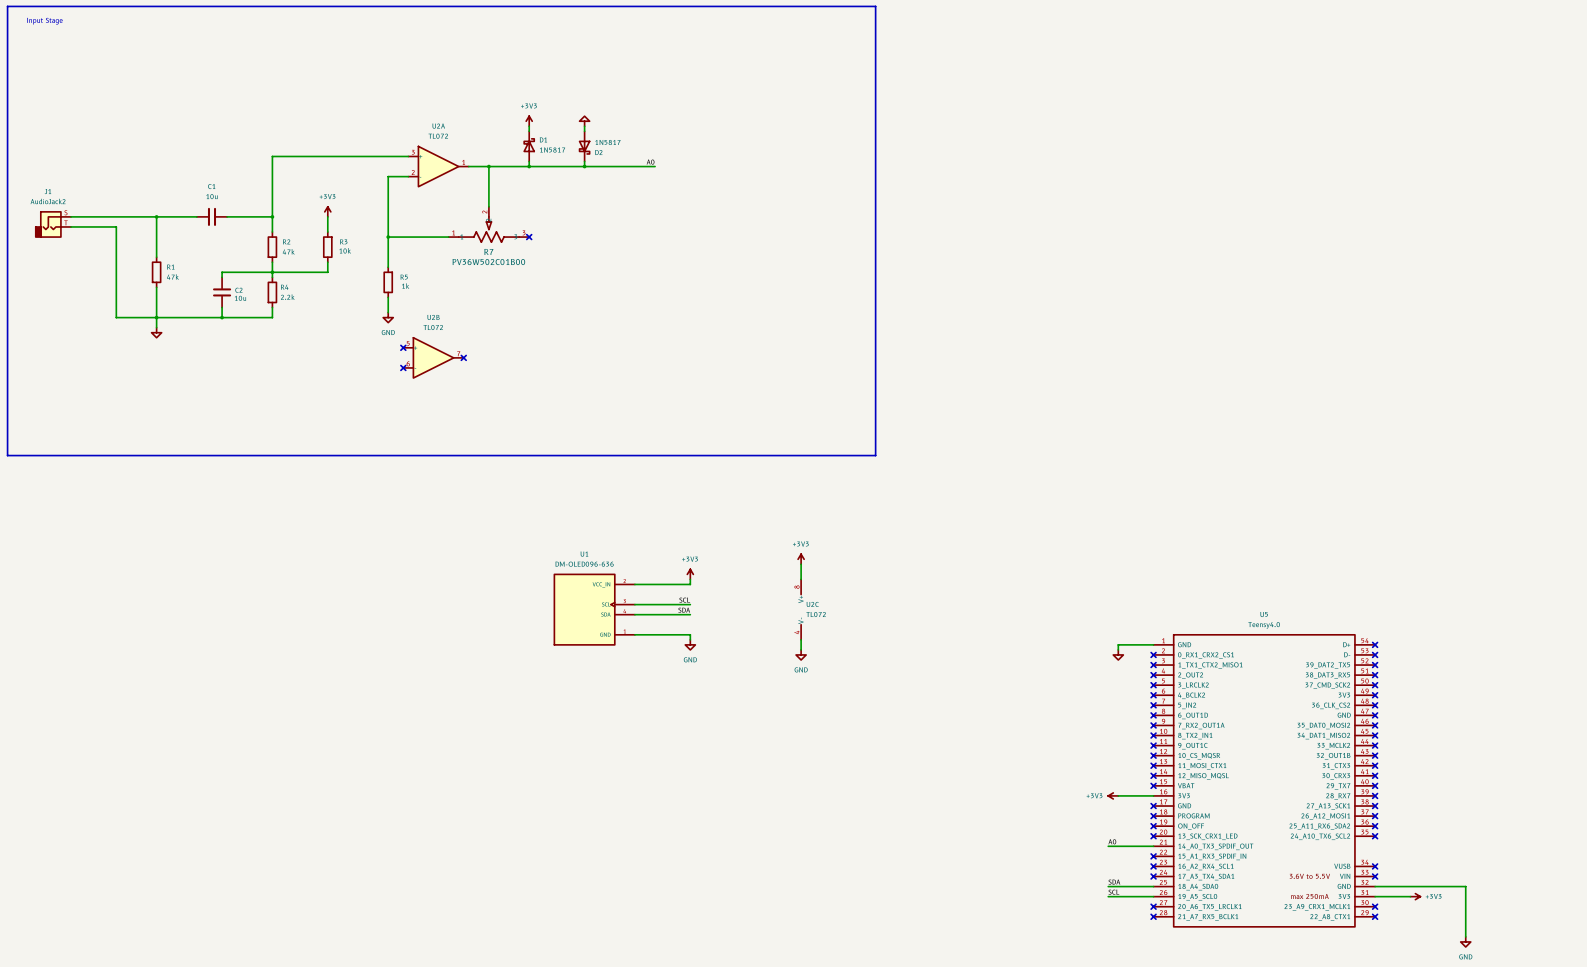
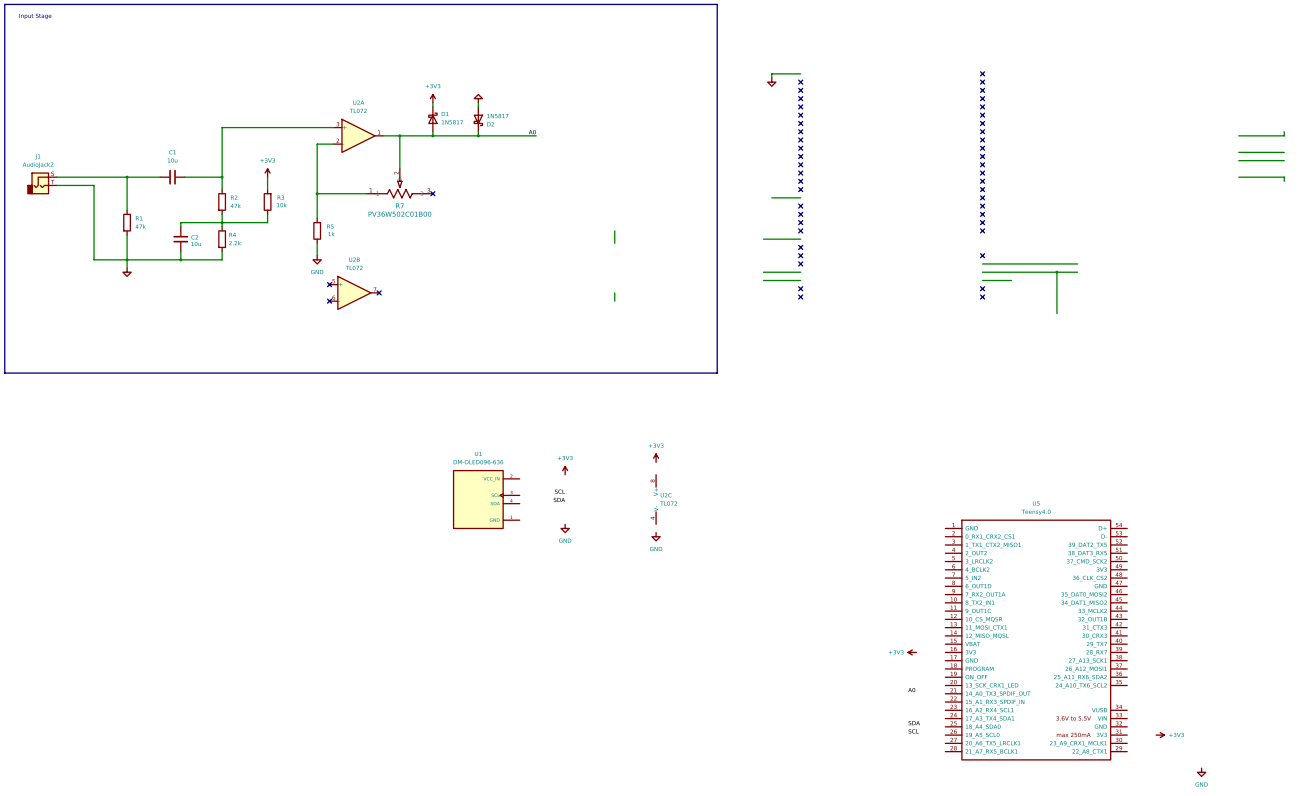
wire: none -> (800, 73) (771, 73) (771, 77)
no-connect mark: none -> (982, 73)
power symbol: none -> (771, 82)
no-connect mark: none -> (800, 82)
no-connect mark: none -> (982, 82)
no-connect mark: none -> (800, 90)
no-connect mark: none -> (982, 90)
no-connect mark: none -> (800, 98)
no-connect mark: none -> (982, 98)
no-connect mark: none -> (800, 106)
no-connect mark: none -> (982, 106)
no-connect mark: none -> (800, 115)
no-connect mark: none -> (982, 115)
no-connect mark: none -> (800, 123)
no-connect mark: none -> (982, 123)
no-connect mark: none -> (800, 131)
no-connect mark: none -> (982, 131)
wire: none -> (1284, 131) (1284, 135) (1238, 135)
no-connect mark: none -> (800, 139)
no-connect mark: none -> (982, 139)
no-connect mark: none -> (800, 148)
no-connect mark: none -> (982, 148)
wire: none -> (1238, 152) (1284, 152)
no-connect mark: none -> (800, 156)
no-connect mark: none -> (982, 156)
wire: none -> (1238, 160) (1284, 160)
no-connect mark: none -> (800, 164)
no-connect mark: none -> (982, 164)
no-connect mark: none -> (800, 173)
no-connect mark: none -> (982, 173)
wire: none -> (1238, 177) (1284, 177) (1284, 181)
no-connect mark: none -> (800, 181)
no-connect mark: none -> (982, 181)
no-connect mark: none -> (800, 189)
no-connect mark: none -> (982, 189)
wire: none -> (771, 197) (800, 197)
no-connect mark: none -> (982, 197)
no-connect mark: none -> (800, 206)
no-connect mark: none -> (982, 206)
no-connect mark: none -> (800, 214)
no-connect mark: none -> (982, 214)
no-connect mark: none -> (800, 222)
no-connect mark: none -> (982, 222)
wire: none -> (614, 230) (614, 243)
no-connect mark: none -> (800, 230)
no-connect mark: none -> (982, 230)
wire: none -> (763, 239) (800, 239)
no-connect mark: none -> (800, 247)
no-connect mark: none -> (800, 255)
no-connect mark: none -> (982, 255)
no-connect mark: none -> (800, 263)
wire: none -> (982, 263) (1077, 263)
wire: none -> (763, 272) (800, 272)
wire: none -> (982, 272) (1077, 272)
wire: none -> (1056, 272) (1056, 313)
junction: none -> (1056, 272)
wire: none -> (763, 280) (800, 280)
wire: none -> (982, 280) (1011, 280)
no-connect mark: none -> (800, 288)
no-connect mark: none -> (982, 288)
wire: none -> (614, 292) (614, 301)
no-connect mark: none -> (800, 297)
no-connect mark: none -> (982, 297)
wire: (801, 564) (801, 579) -> none
wire: (690, 579) (690, 584) (634, 584) -> none
wire: (634, 604) (690, 604) -> none
wire: (634, 614) (690, 614) -> none
wire: (634, 634) (690, 634) (690, 639) -> none
wire: (801, 639) (801, 649) -> none
wire: (1153, 644) (1118, 644) (1118, 649) -> none
no-connect mark: (1375, 644) -> none
power symbol: (1118, 654) -> none
no-connect mark: (1153, 654) -> none
no-connect mark: (1375, 654) -> none
no-connect mark: (1153, 665) -> none
no-connect mark: (1375, 665) -> none
no-connect mark: (1153, 675) -> none
no-connect mark: (1375, 675) -> none
no-connect mark: (1153, 685) -> none
no-connect mark: (1375, 685) -> none
no-connect mark: (1153, 695) -> none
no-connect mark: (1375, 695) -> none
no-connect mark: (1153, 705) -> none
no-connect mark: (1375, 705) -> none
no-connect mark: (1153, 715) -> none
no-connect mark: (1375, 715) -> none
no-connect mark: (1153, 725) -> none
no-connect mark: (1375, 725) -> none
no-connect mark: (1153, 735) -> none
no-connect mark: (1375, 735) -> none
no-connect mark: (1153, 745) -> none
no-connect mark: (1375, 745) -> none
no-connect mark: (1153, 755) -> none
no-connect mark: (1375, 755) -> none
no-connect mark: (1153, 765) -> none
no-connect mark: (1375, 765) -> none
no-connect mark: (1153, 775) -> none
no-connect mark: (1375, 775) -> none
no-connect mark: (1153, 785) -> none
no-connect mark: (1375, 785) -> none
wire: (1118, 795) (1153, 795) -> none
no-connect mark: (1375, 795) -> none
no-connect mark: (1153, 806) -> none
no-connect mark: (1375, 806) -> none
no-connect mark: (1153, 816) -> none
no-connect mark: (1375, 816) -> none
no-connect mark: (1153, 826) -> none
no-connect mark: (1375, 826) -> none
no-connect mark: (1153, 836) -> none
no-connect mark: (1375, 836) -> none
wire: (1108, 846) (1153, 846) -> none
no-connect mark: (1153, 856) -> none
no-connect mark: (1153, 866) -> none
no-connect mark: (1375, 866) -> none
no-connect mark: (1153, 876) -> none
no-connect mark: (1375, 876) -> none
wire: (1108, 886) (1153, 886) -> none
wire: (1375, 886) (1465, 886) (1465, 936) -> none
wire: (1108, 896) (1153, 896) -> none
wire: (1375, 896) (1410, 896) -> none
no-connect mark: (1153, 906) -> none
no-connect mark: (1375, 906) -> none
no-connect mark: (1153, 916) -> none
no-connect mark: (1375, 916) -> none

